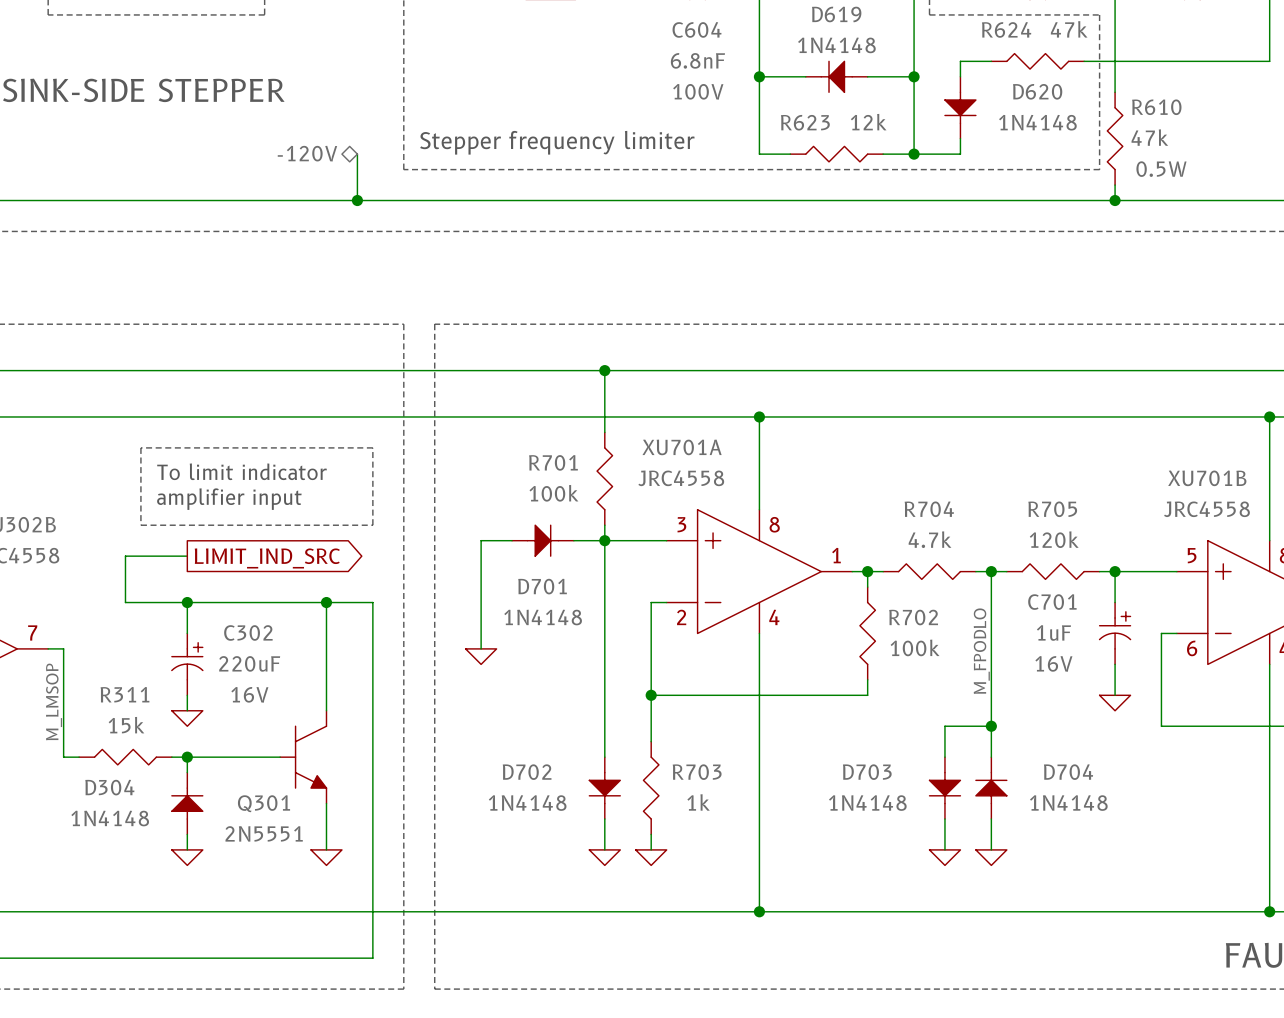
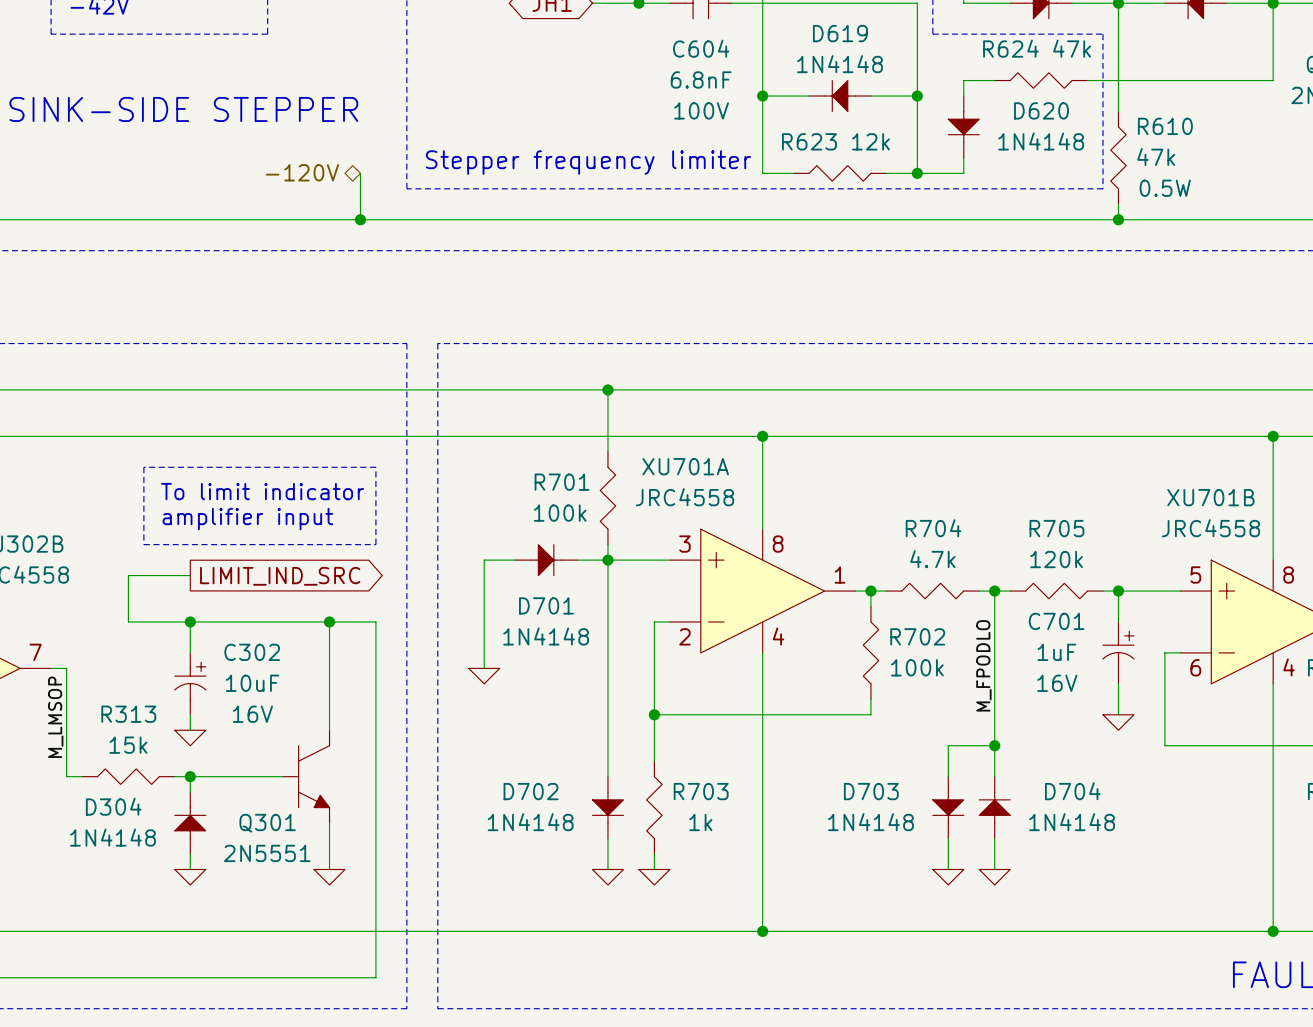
C302 value: 220uF (249, 663) -> 10uF (252, 683)
R311 name: R311 (124, 694) -> R313 (128, 714)

